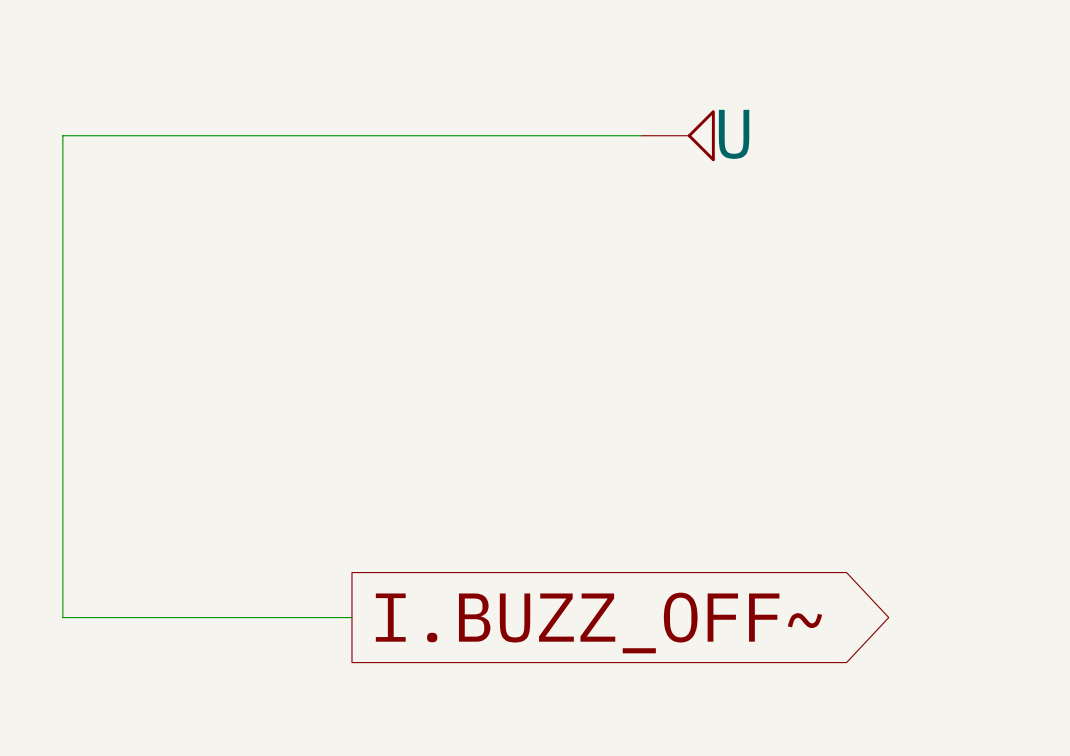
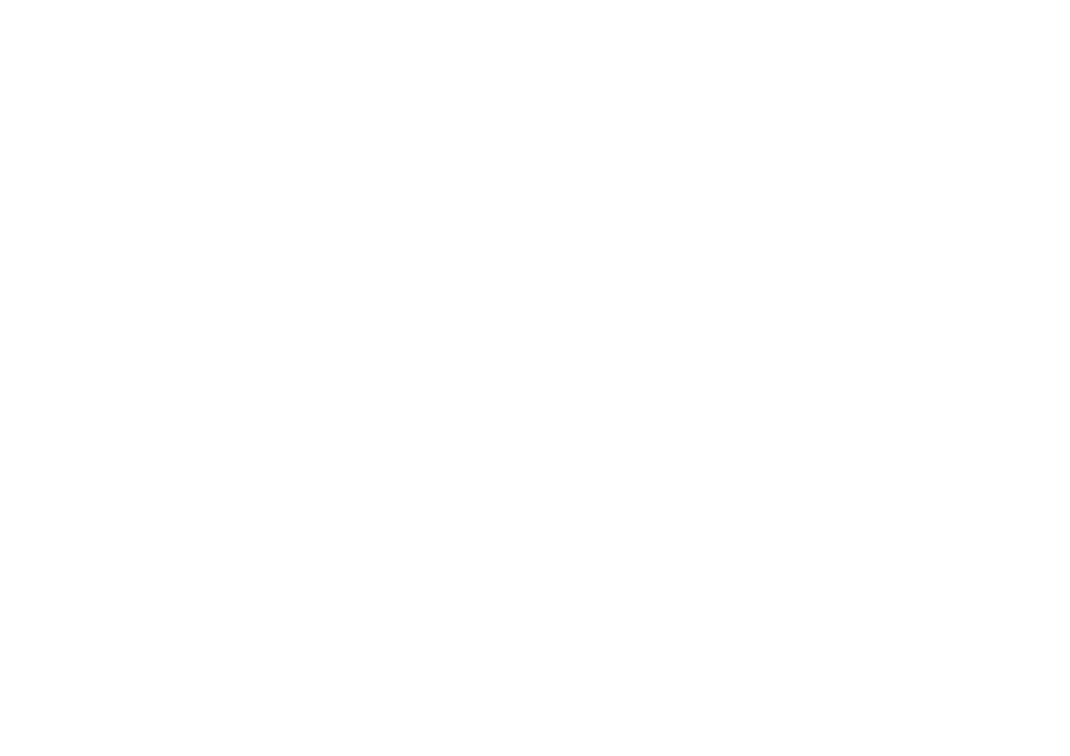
wire: (641, 135) (62, 135) (62, 617) (351, 617) -> none
U: (677, 135) -> none
global label: I.BUZZ_OFF~ (598, 622) -> none

